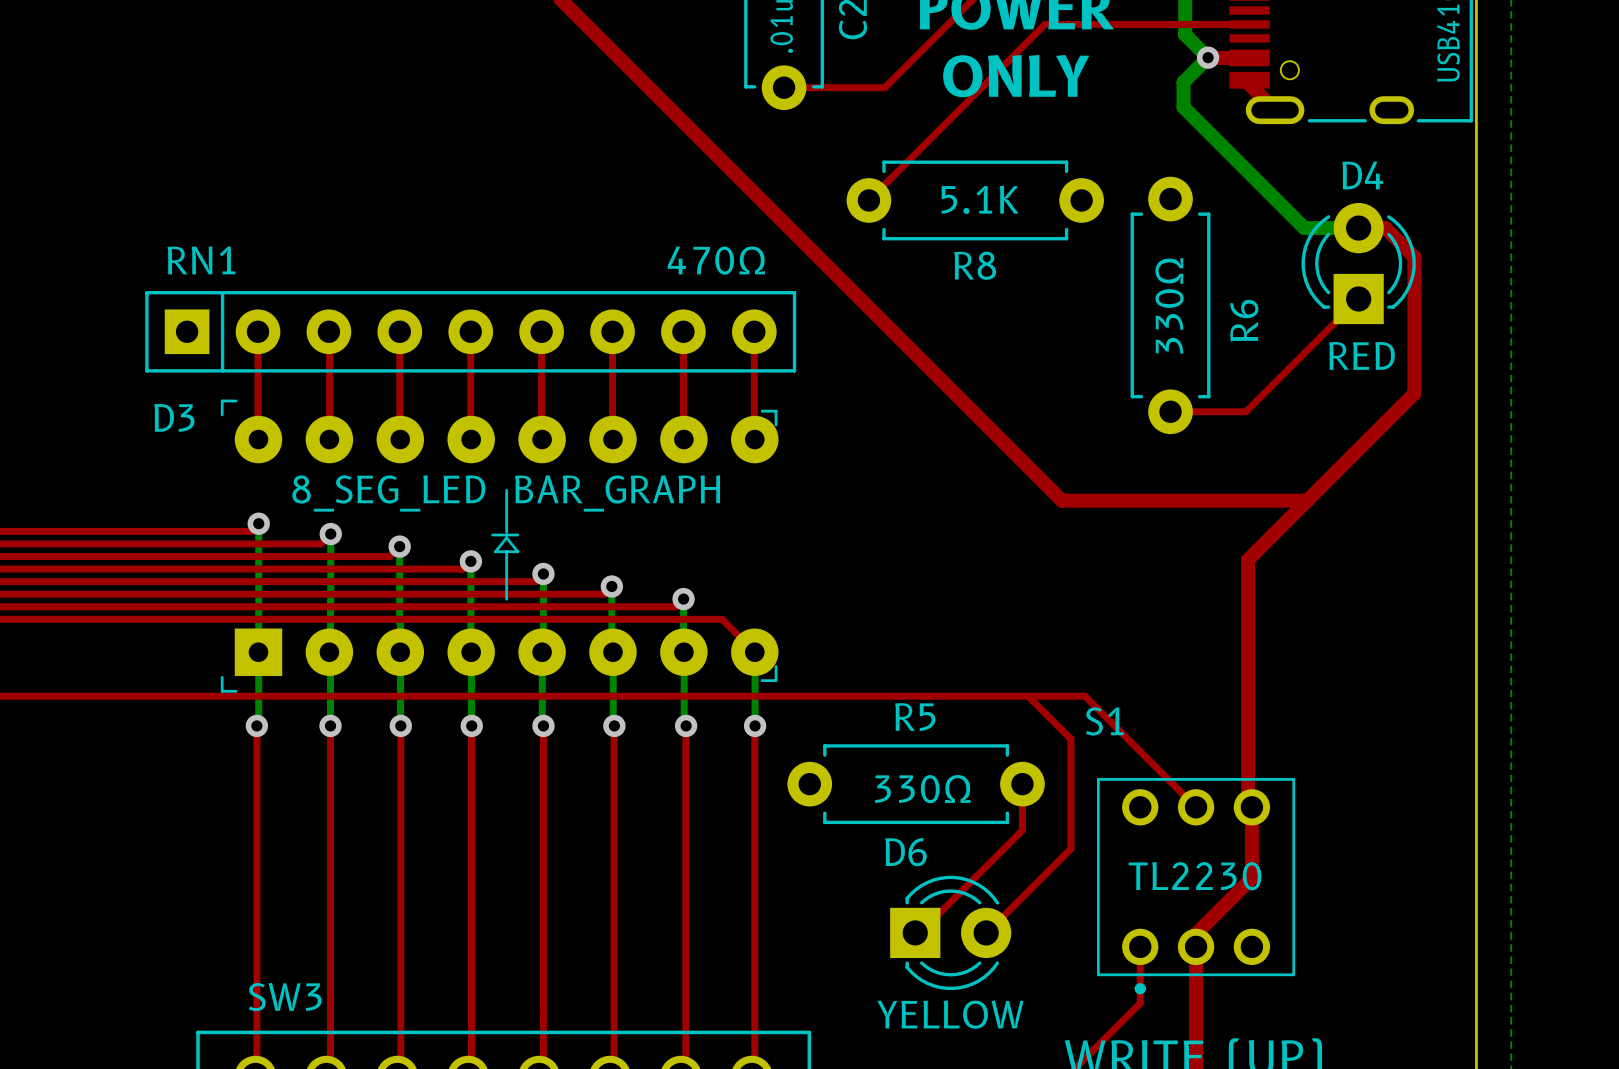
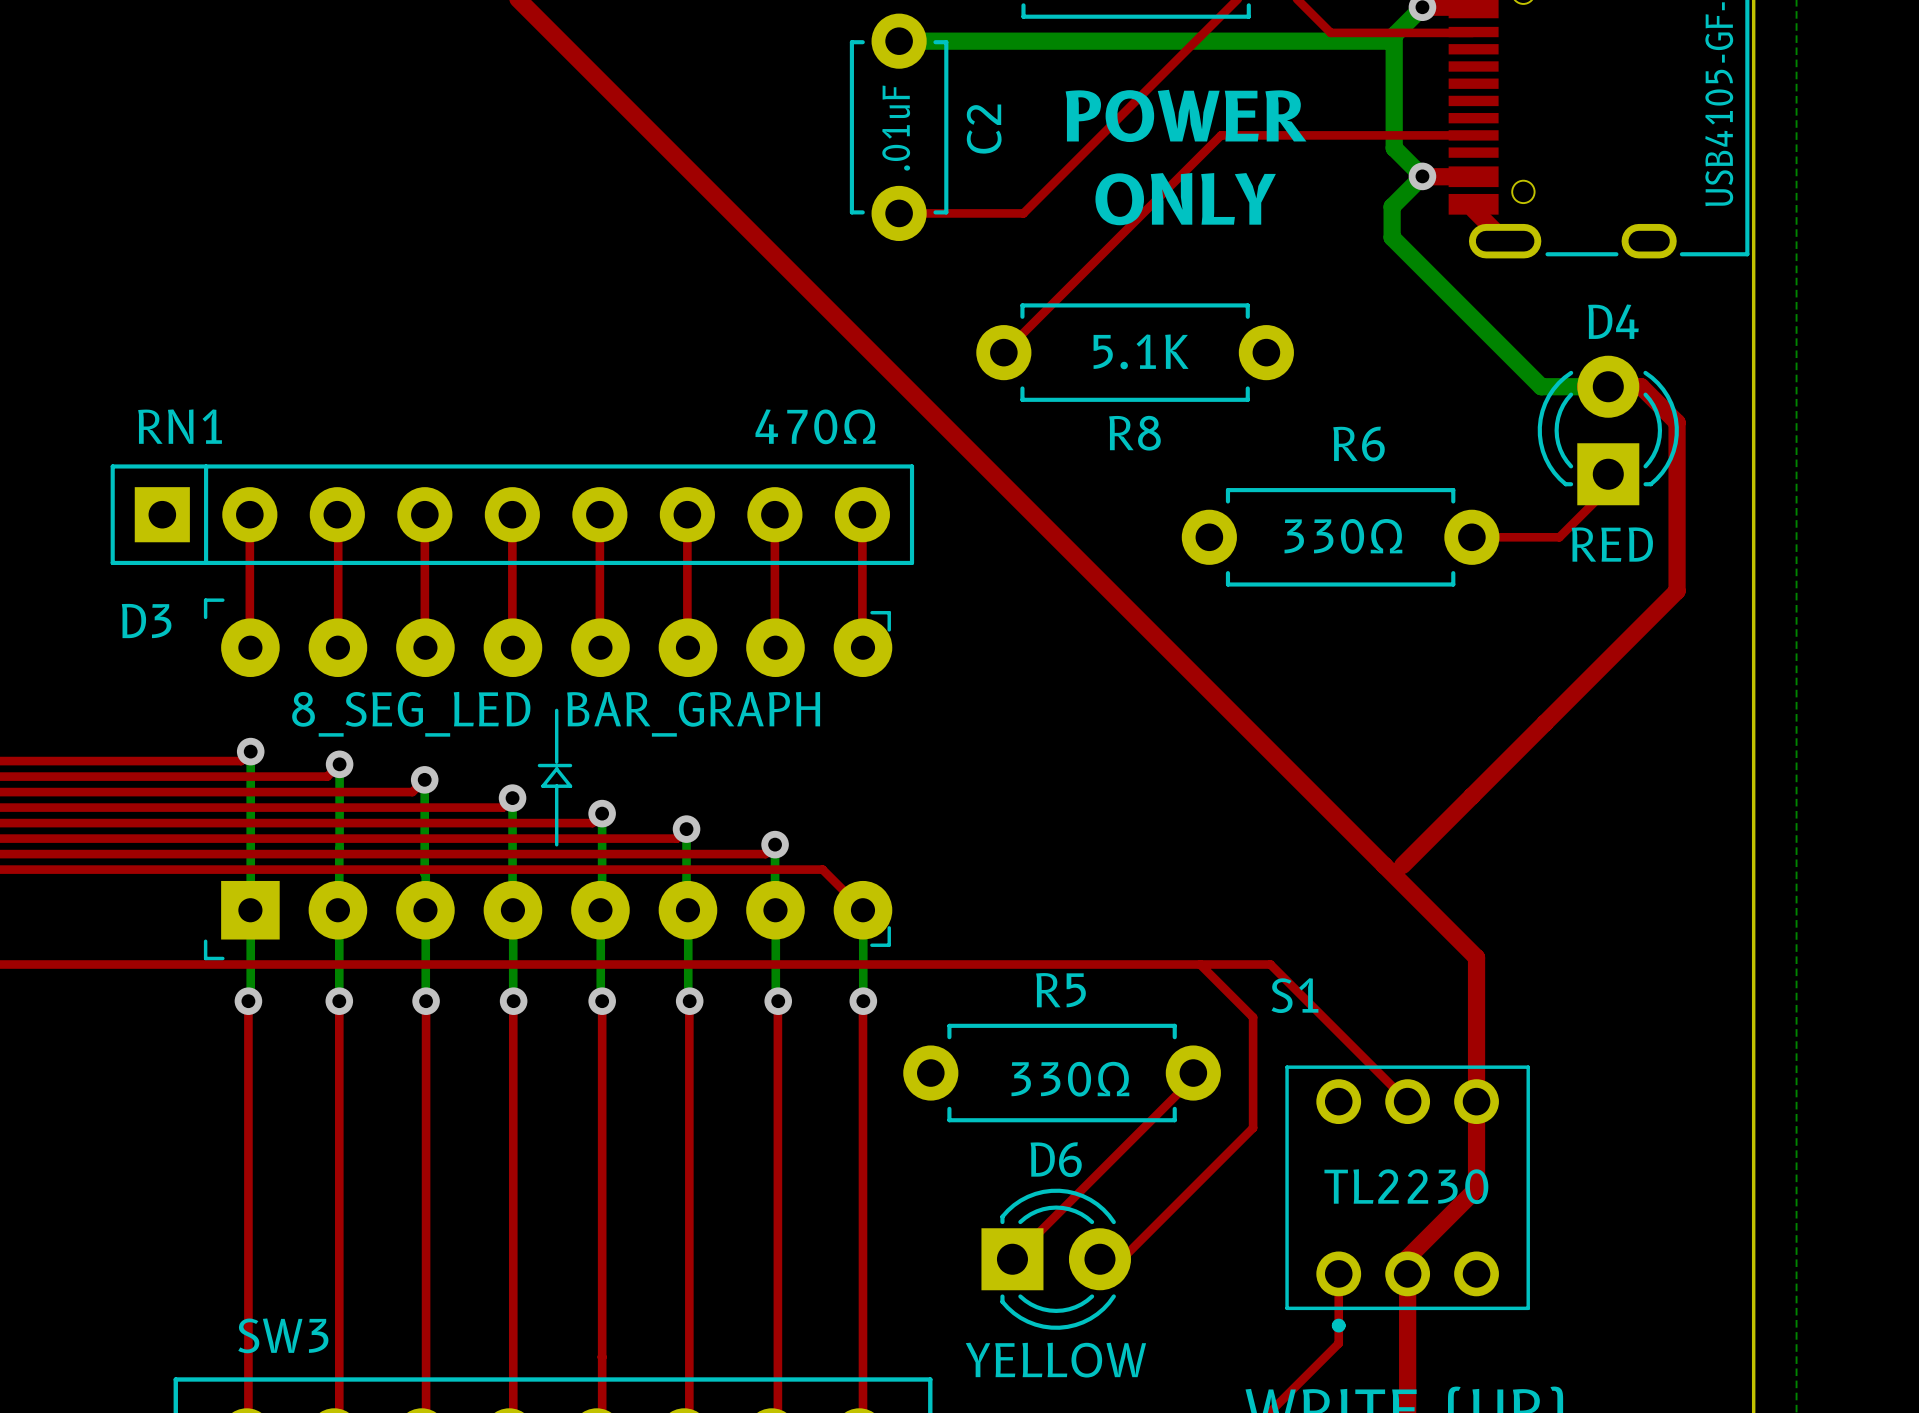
top track: (1358, 298) (1245, 411) (1170, 411) -> (1608, 474) (1608, 488) (1559, 537) (1471, 537)
R6 rotation: 0° (1170, 305) -> 90° clockwise (1340, 537)
R6 name position: R6 (1244, 320) -> R6 (1359, 444)
top track: (1061, 500) (1307, 500) -> none
top track: (1248, 559) (1248, 803) (1251, 807) -> (1242, 723) (1476, 957) (1476, 1101)
top track: none -> (1471, 796) (1402, 865)
top track: (1022, 788) (1022, 830) (919, 933) (915, 933) -> (1193, 1078) (1012, 1259)
top track: (1070, 828) (1070, 848) (986, 933) -> (1253, 1127) (1121, 1259) (1099, 1259)
D6 footprint: [890, 875, 1012, 991] -> [981, 1188, 1131, 1330]

